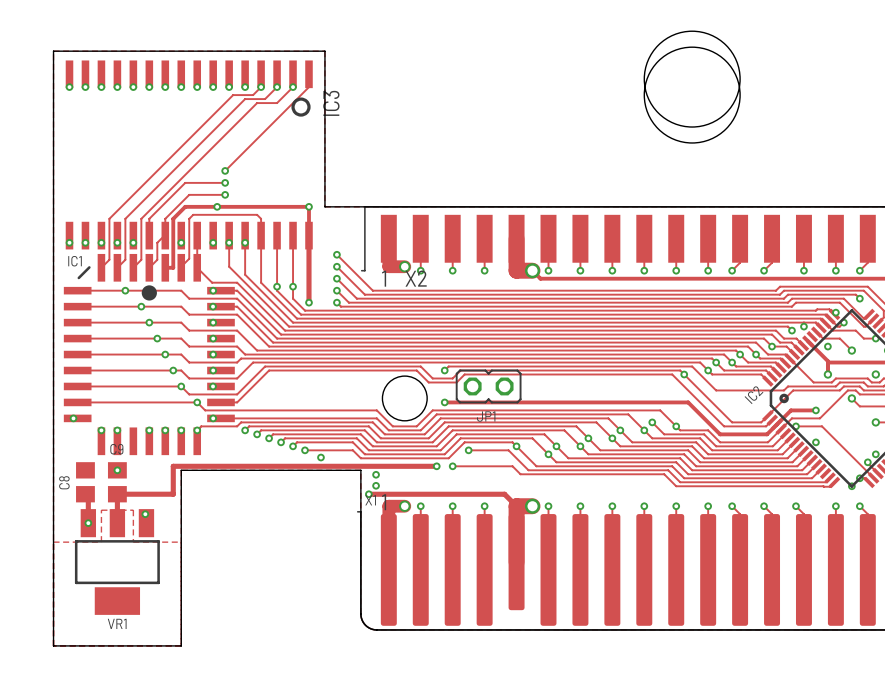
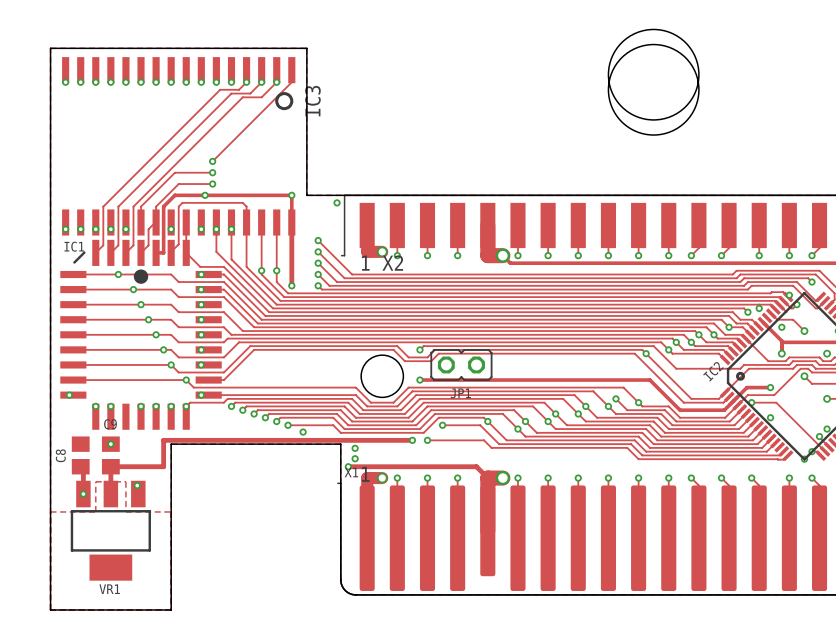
via: none -> (337, 202)
track: (832, 330) (855, 330) (863, 338) (875, 338) -> none
via: (875, 338) -> none

